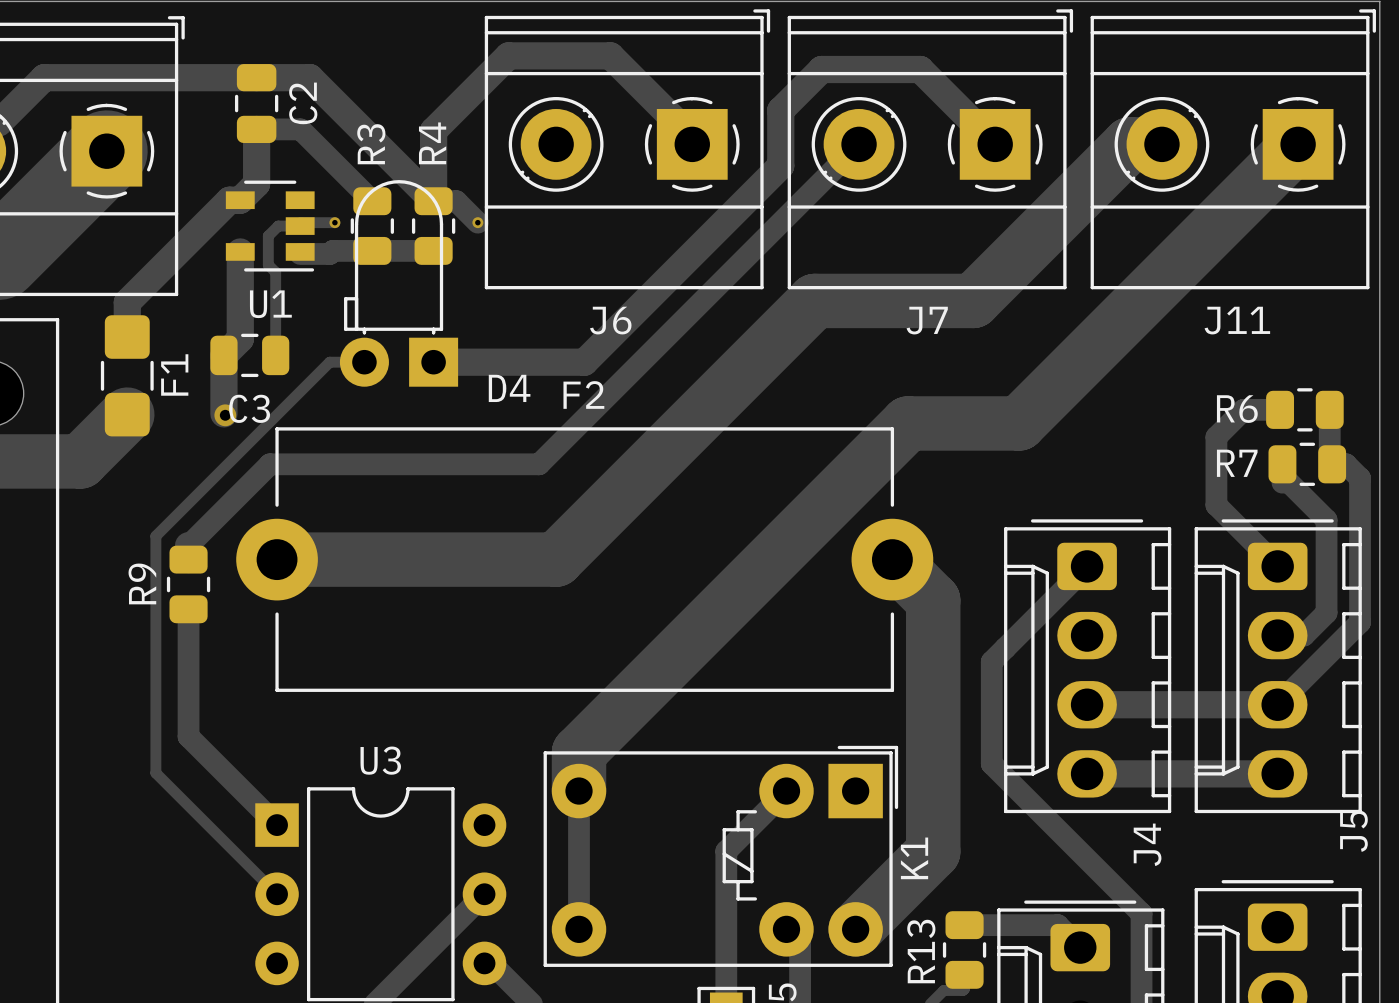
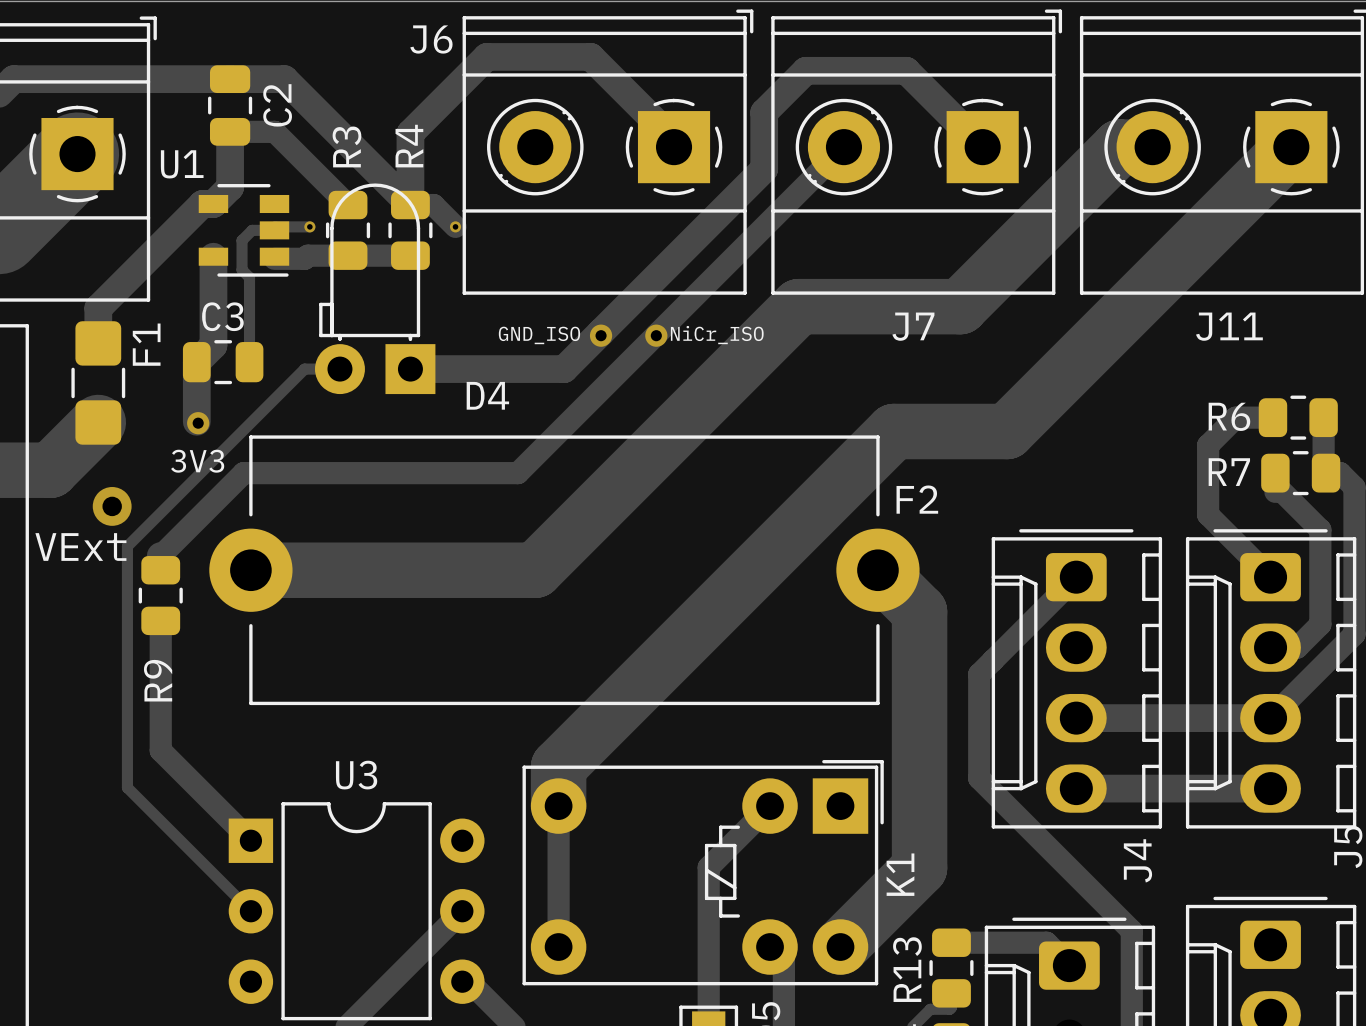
U1 name position: U1 (270, 304) -> U1 (182, 164)
J6 name position: J6 (610, 320) -> J6 (431, 39)
text: none -> NiCr_ISO (717, 335)
text: none -> GND_ISO (539, 335)
via: none -> (601, 335)
via: none -> (656, 335)
F1 name position: F1 (174, 374) -> F1 (146, 344)
F2 name position: F2 (583, 394) -> F2 (917, 499)
C3 name position: C3 (249, 408) -> C3 (222, 316)
text: none -> 3V3 (197, 461)
via: none -> (112, 506)
text: none -> VExt (80, 547)
R9 name position: R9 (142, 583) -> R9 (158, 680)

